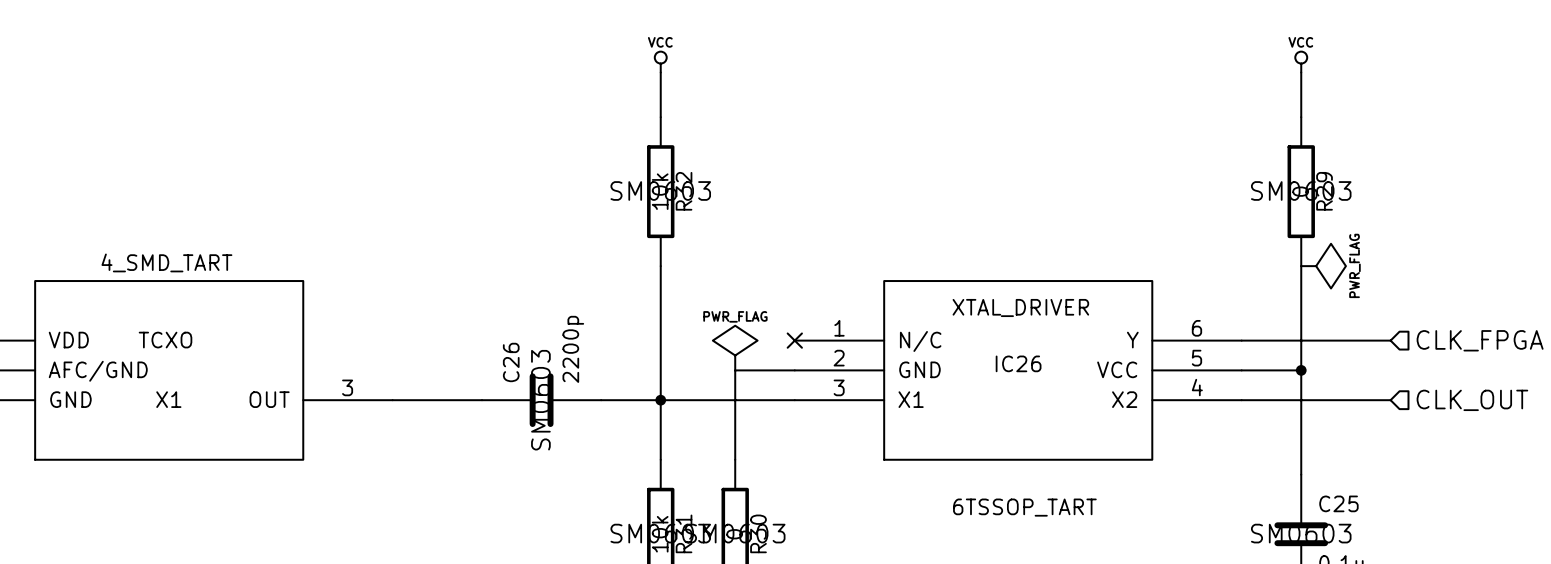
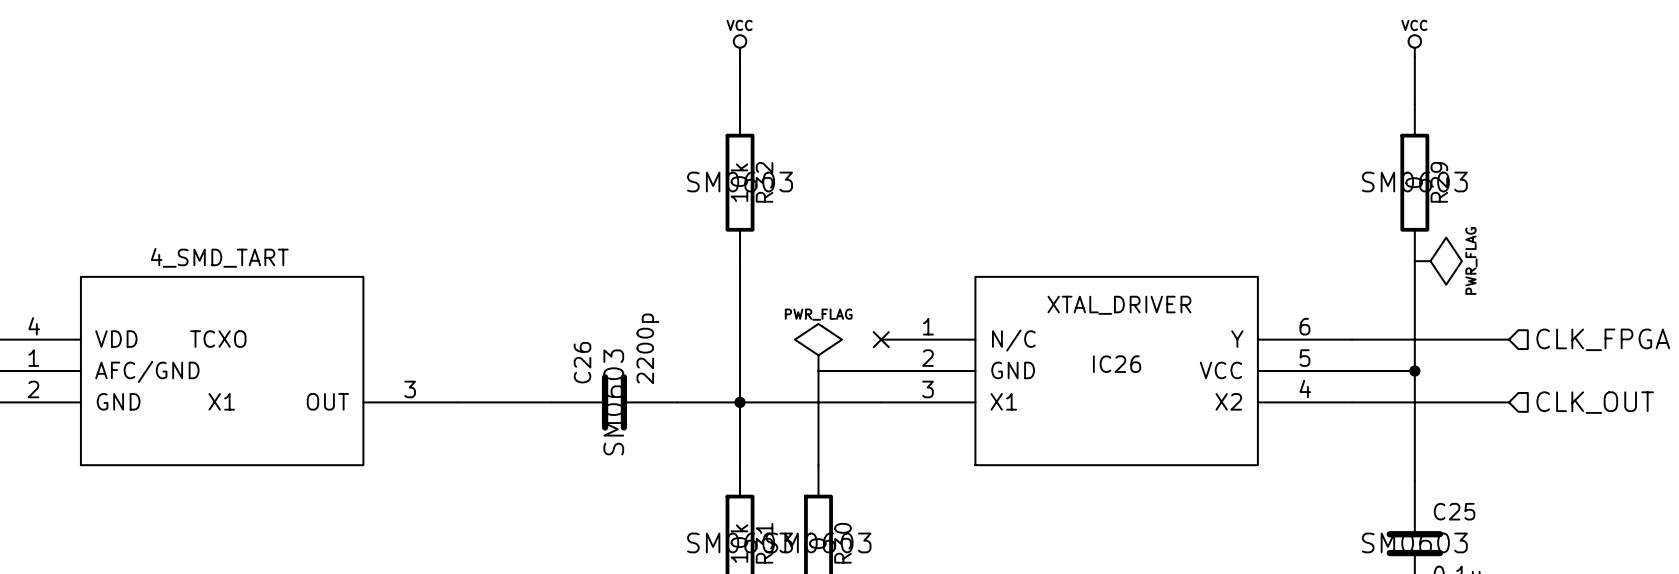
IC26 text: 6TSSOP_TART (1024, 507) -> none

